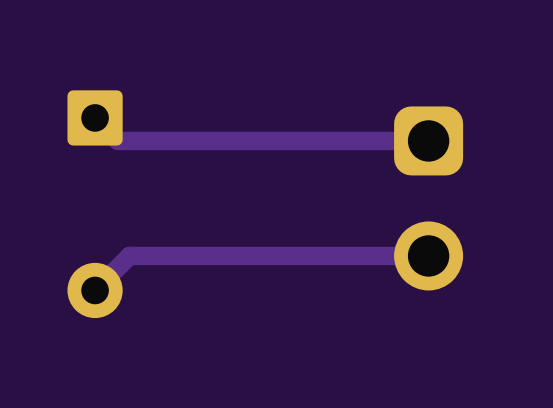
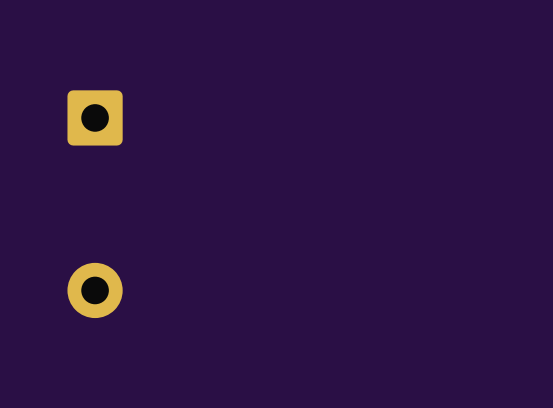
track: (95, 117) (118, 140) (428, 140) -> none
part: (428, 198) -> none
track: (428, 255) (129, 255) (95, 290) -> none

